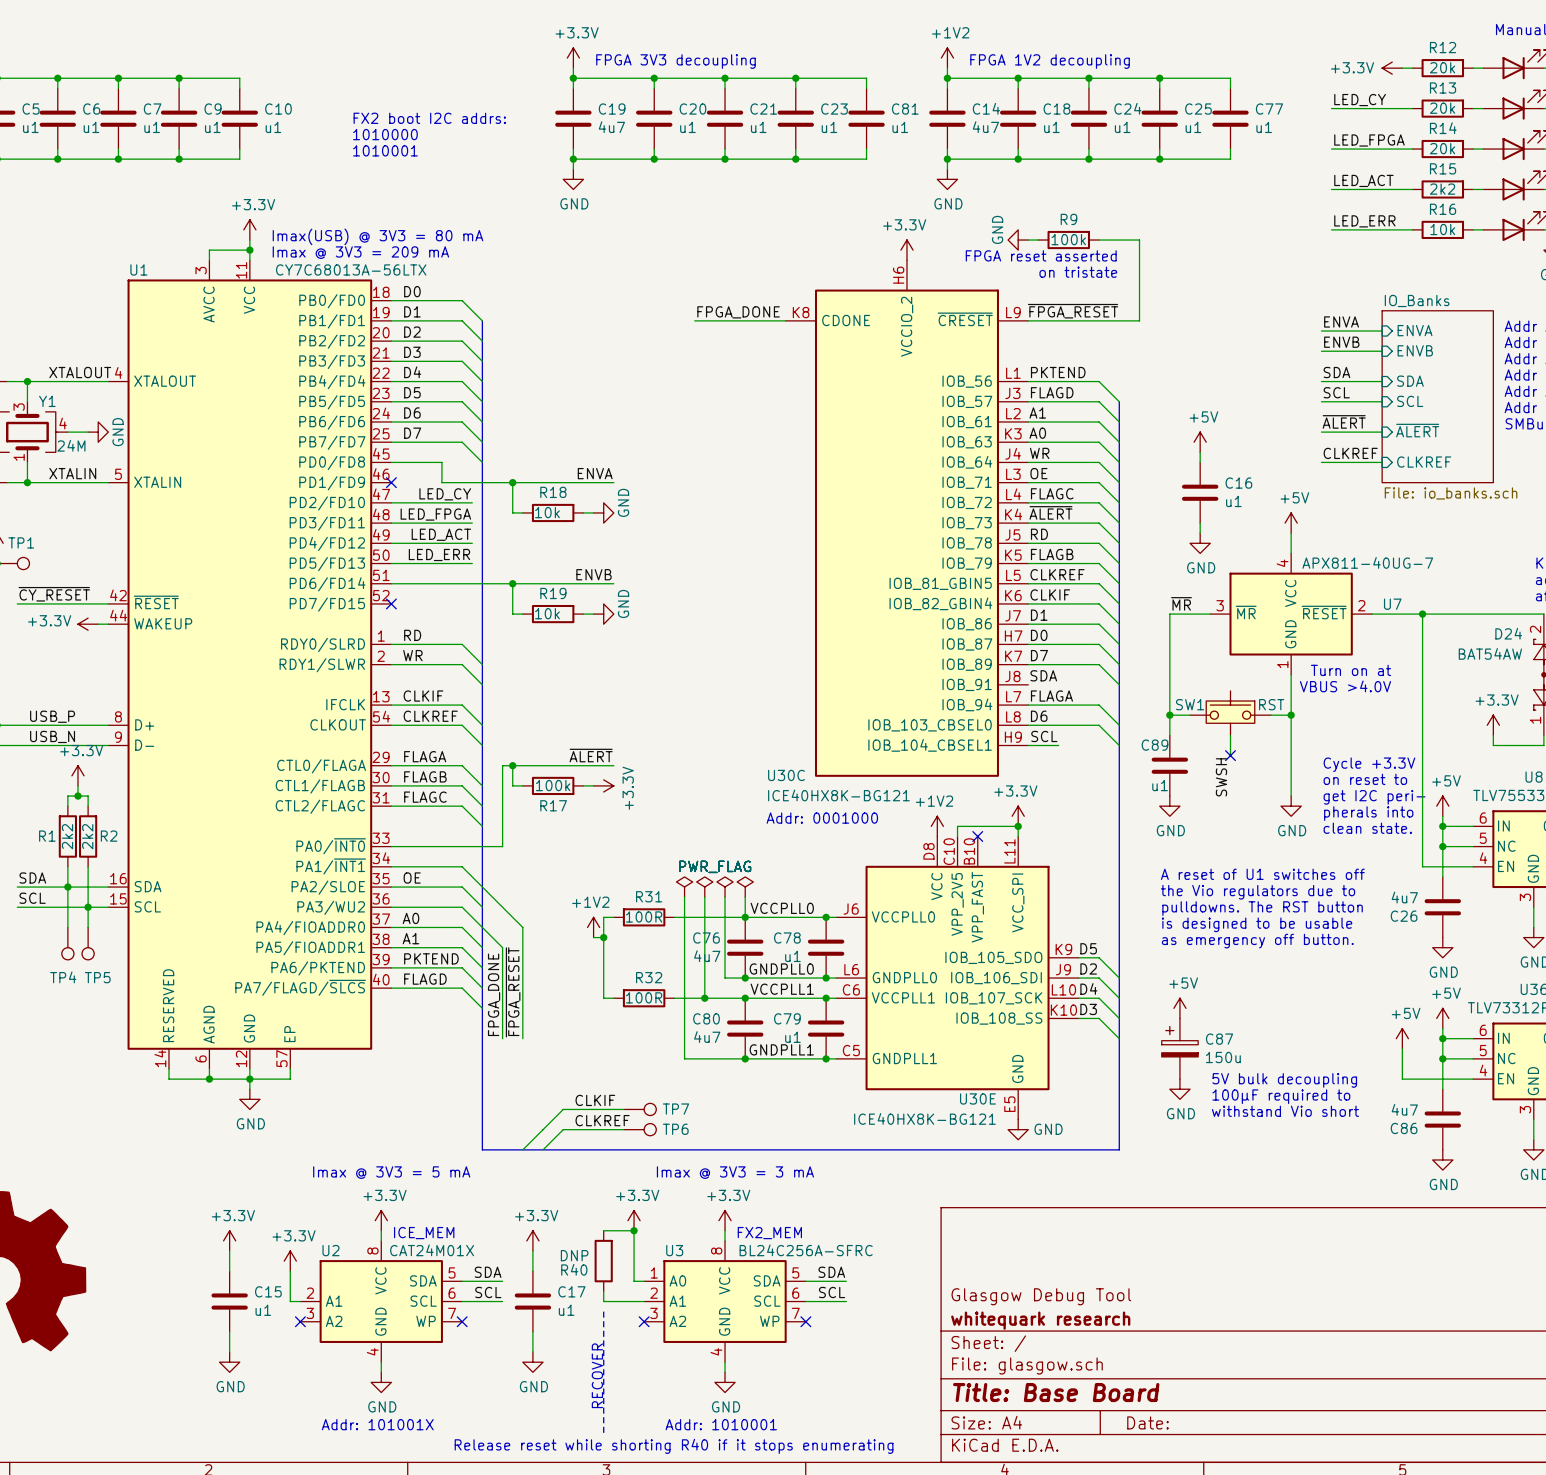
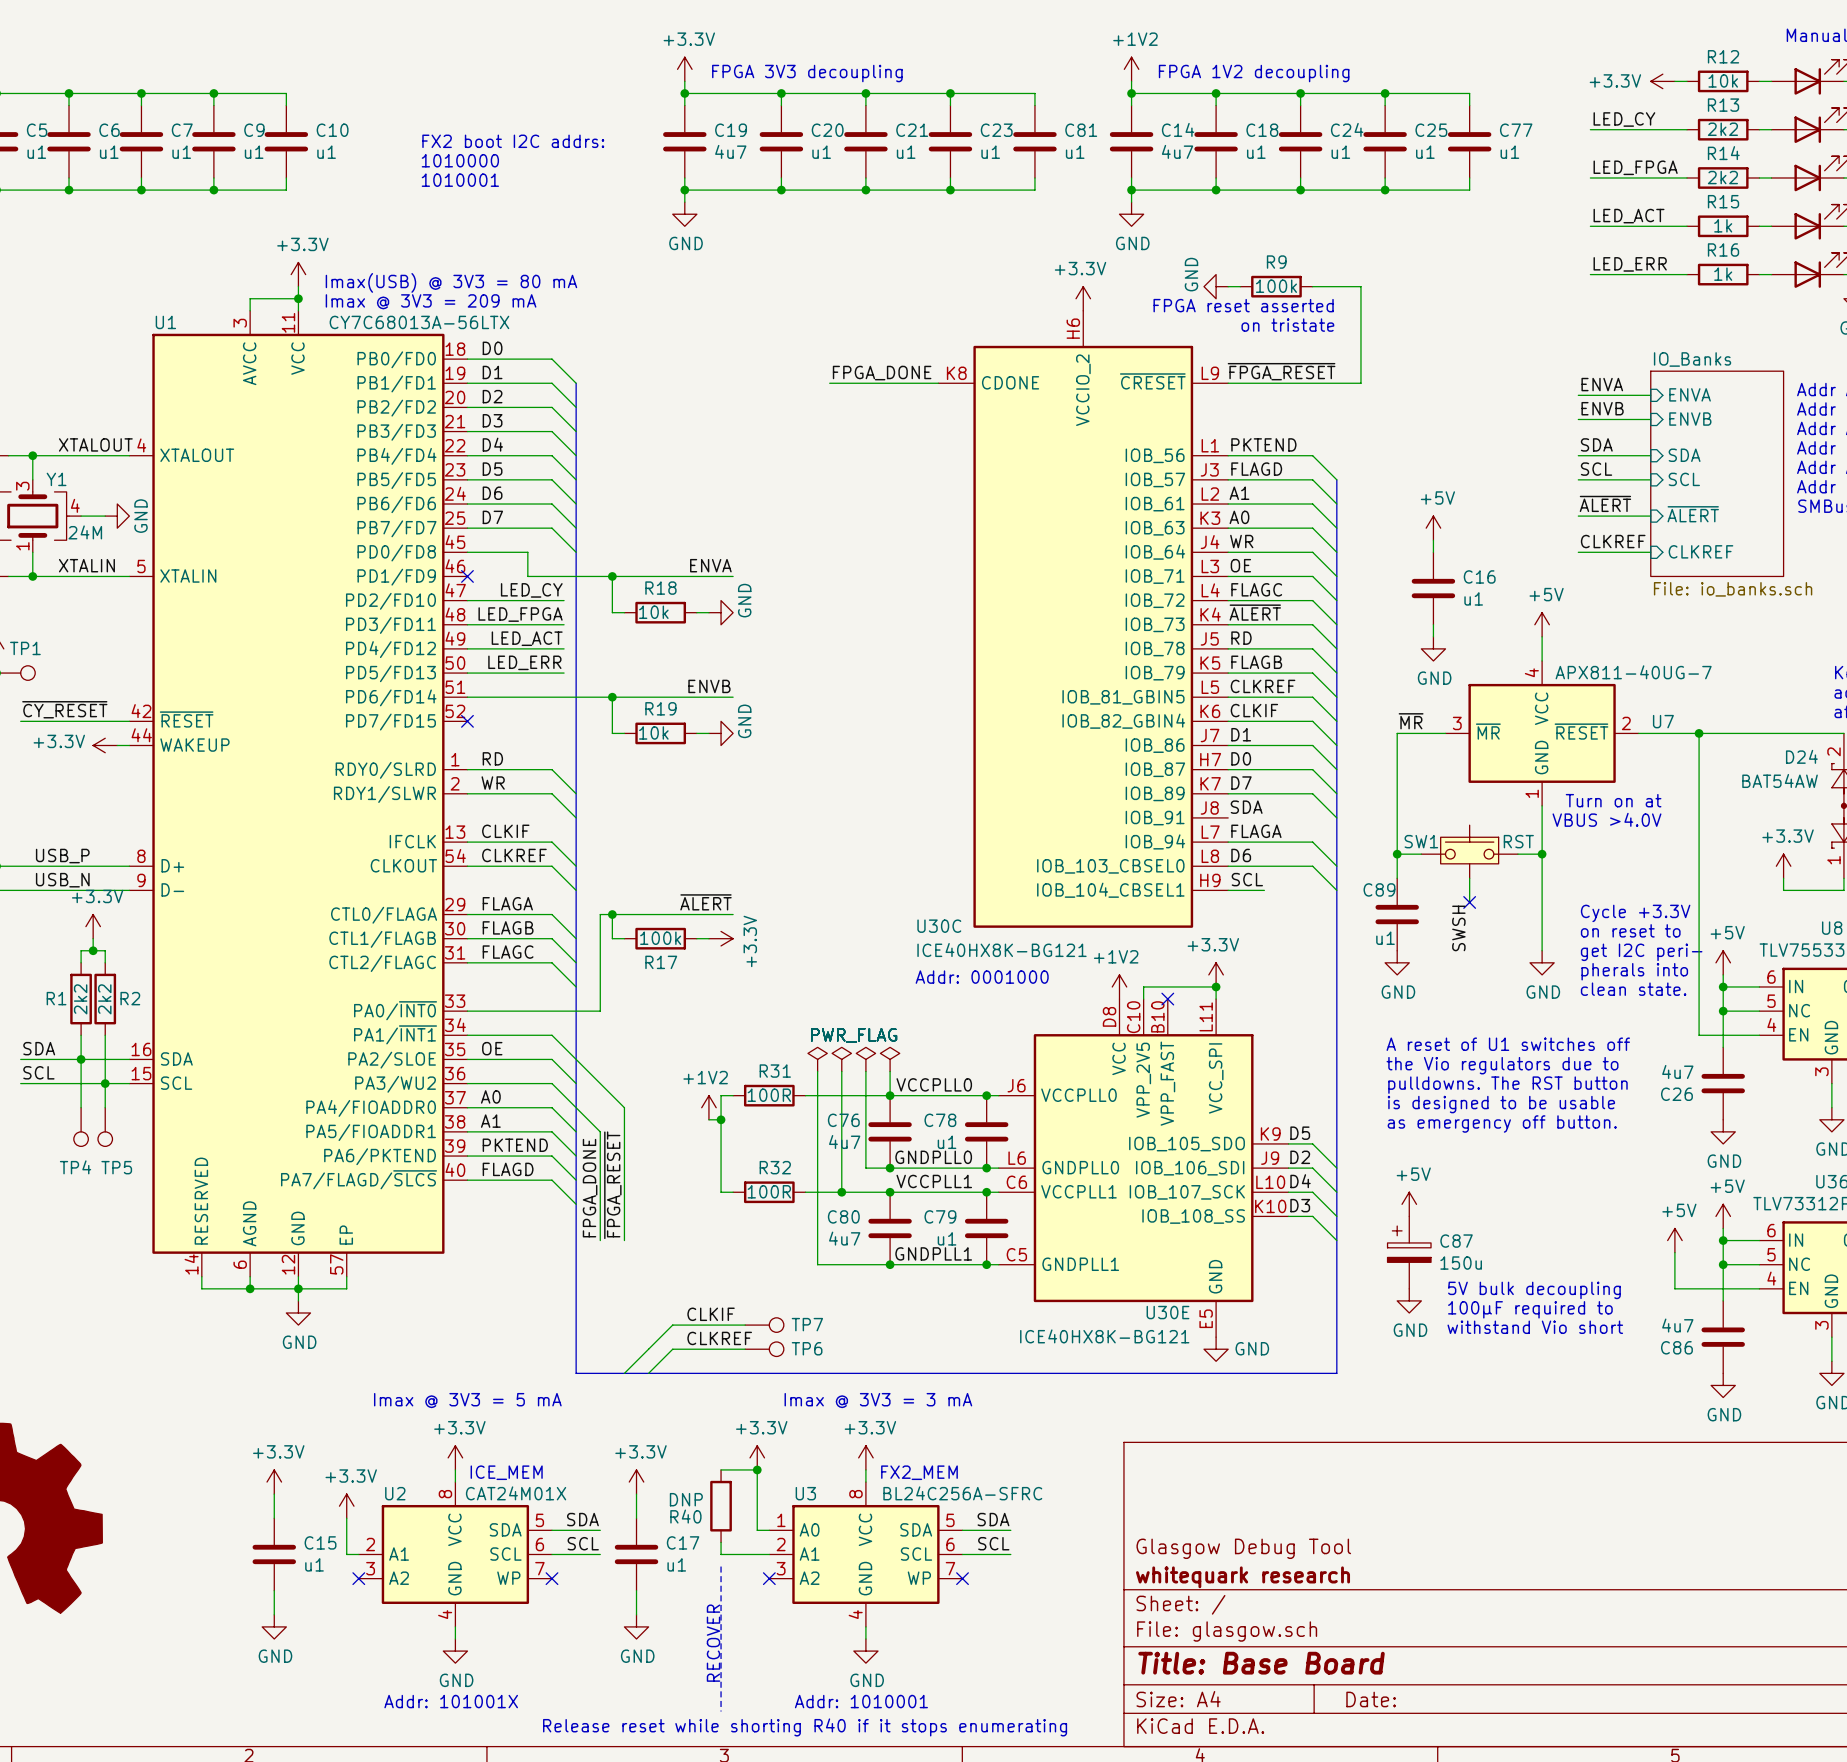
R12 value: 20k (1442, 67) -> 10k (1723, 80)
R13 value: 20k (1442, 108) -> 2k2 (1722, 129)
R14 value: 20k (1442, 148) -> 2k2 (1722, 177)
R15 value: 2k2 (1442, 189) -> 1k (1723, 225)
R16 value: 10k (1442, 229) -> 1k (1723, 274)

